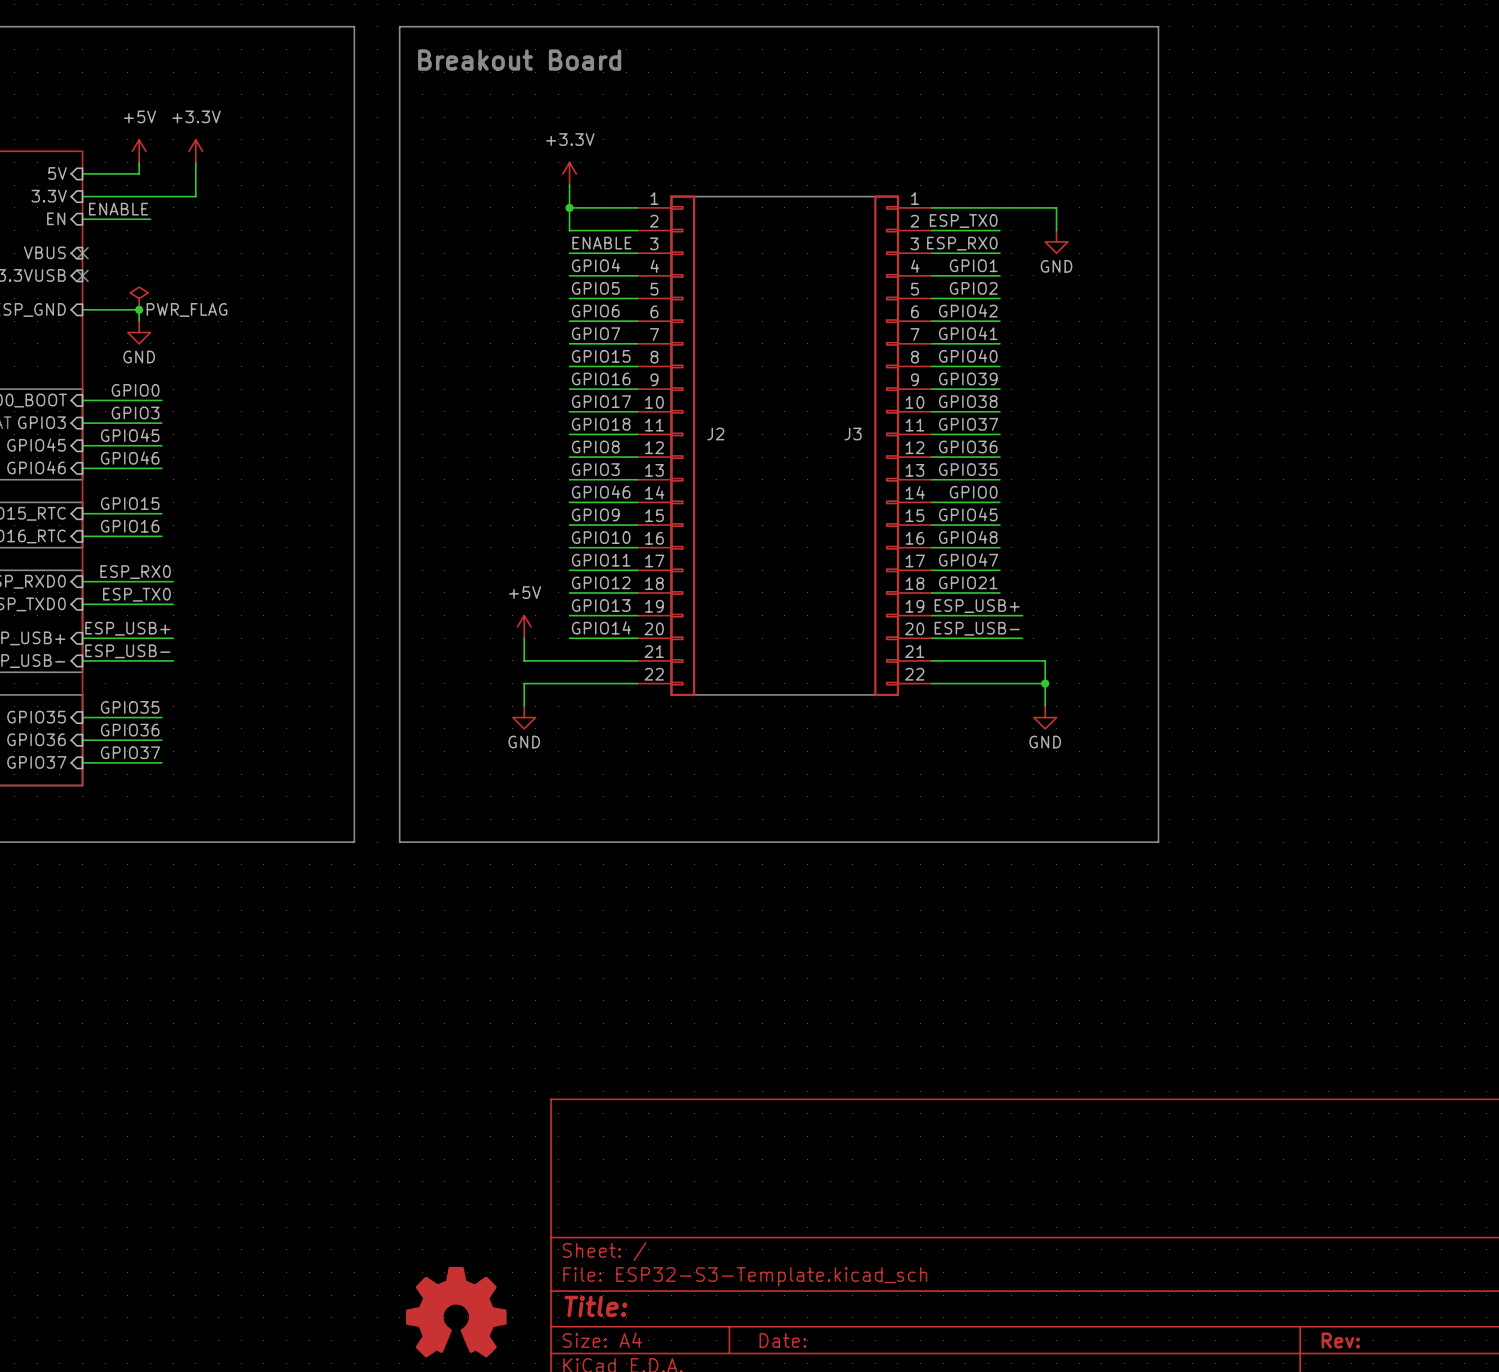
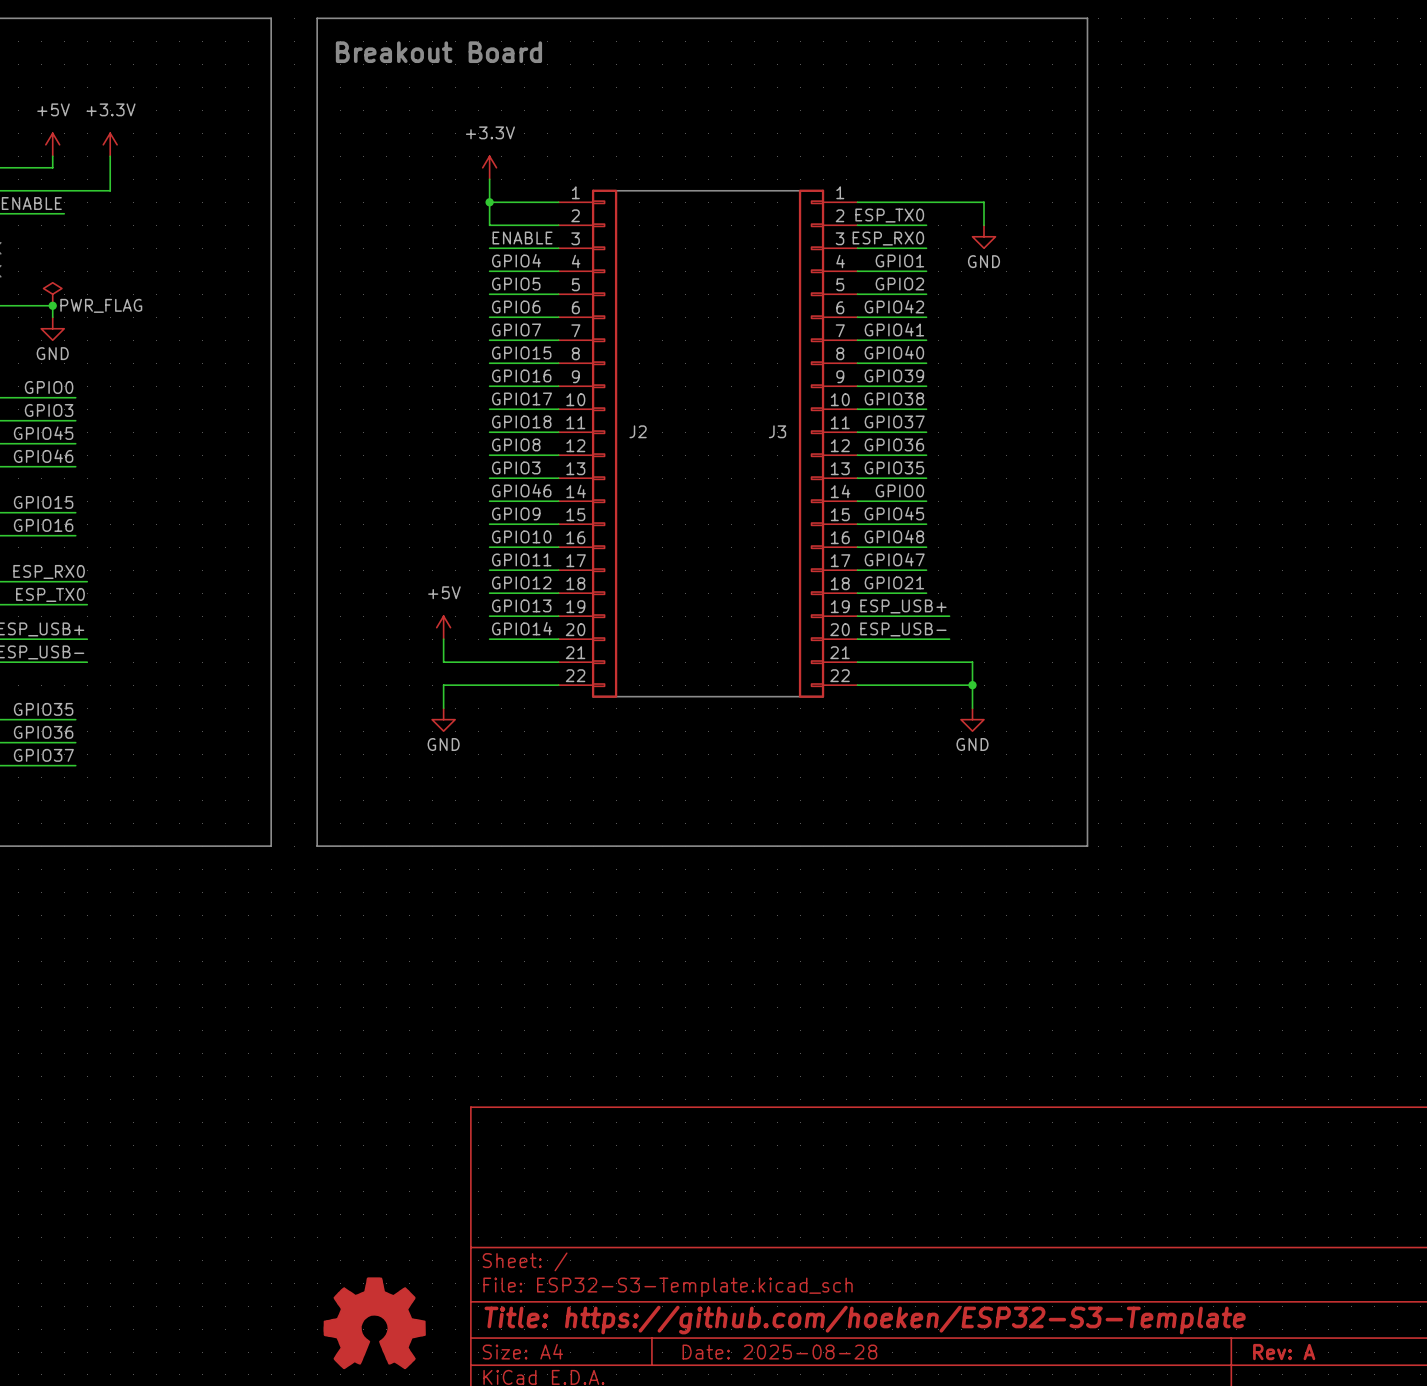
title block: Title: (595, 1306) -> Title: https://github.com/hoeken/ESP32-S3-Template (865, 1320)
title block: Date: (782, 1340) -> Date: 2025-08-28 (779, 1352)
title block: Rev: (1340, 1340) -> Rev: A (1284, 1352)

